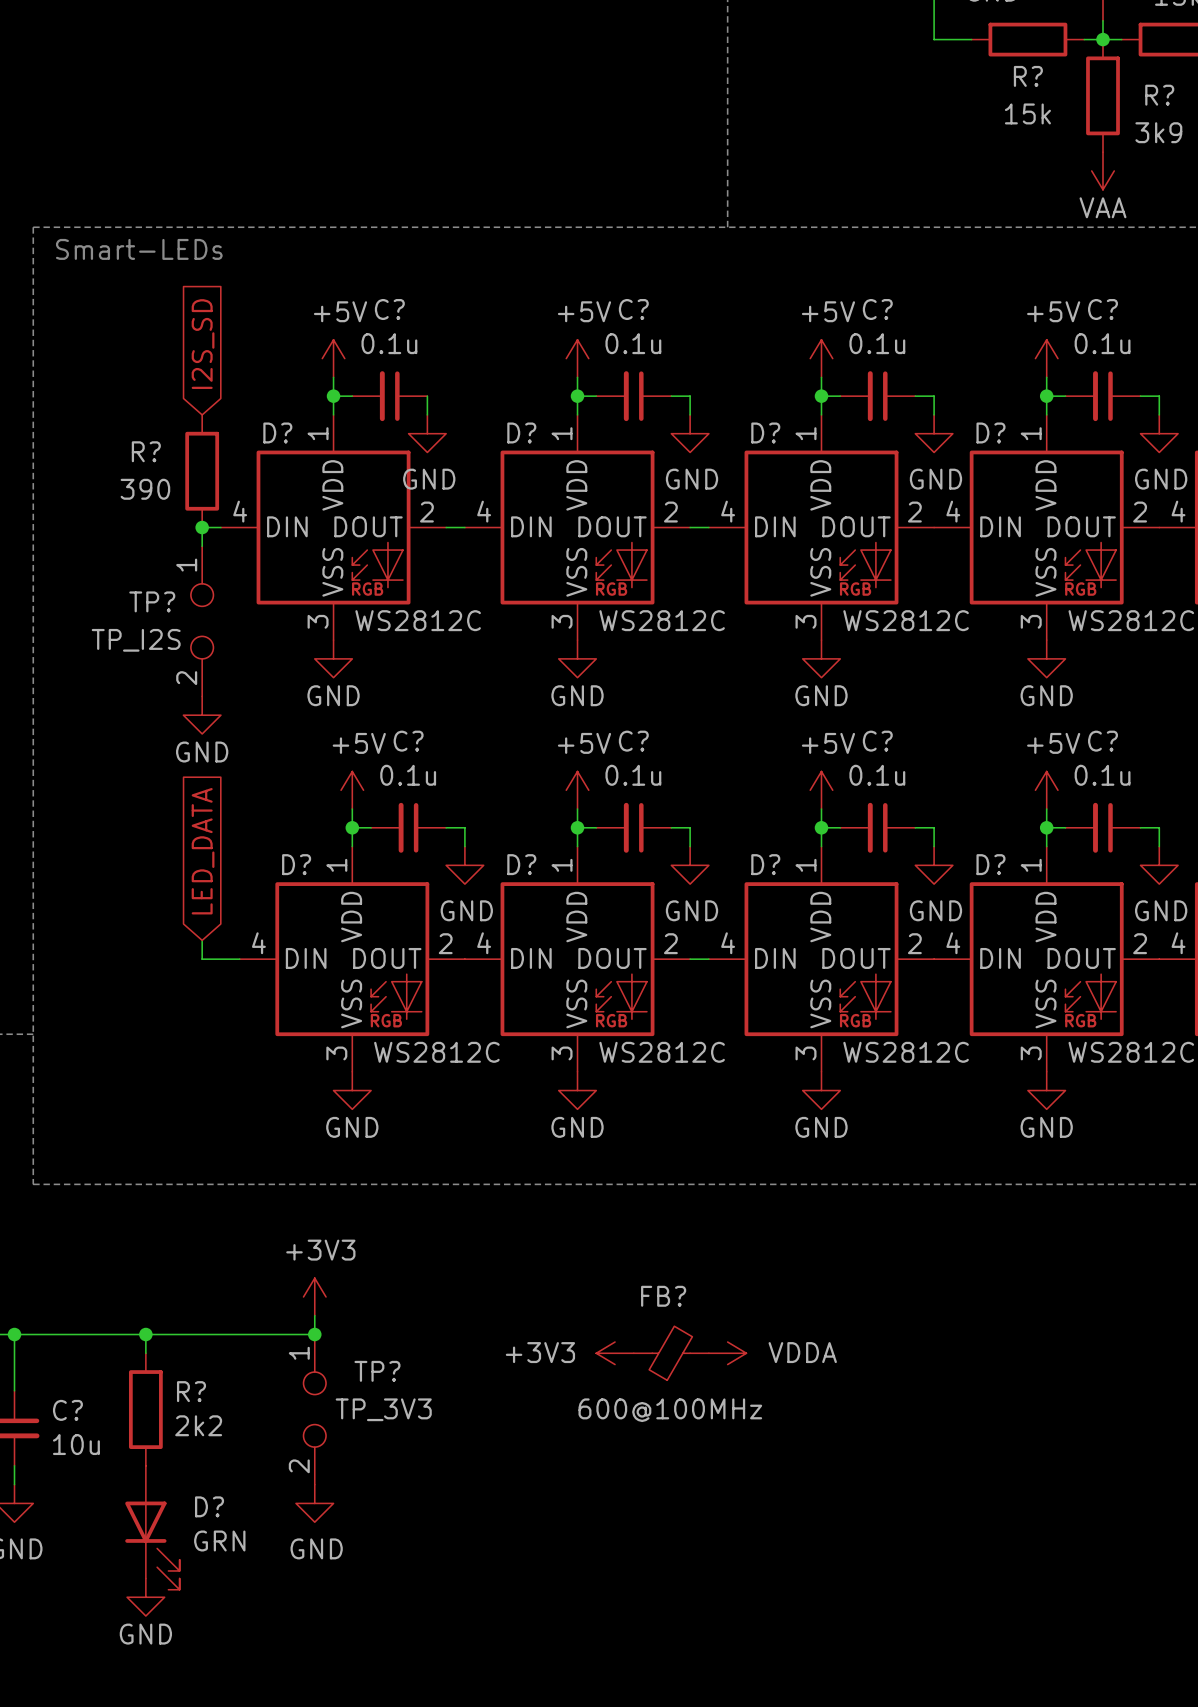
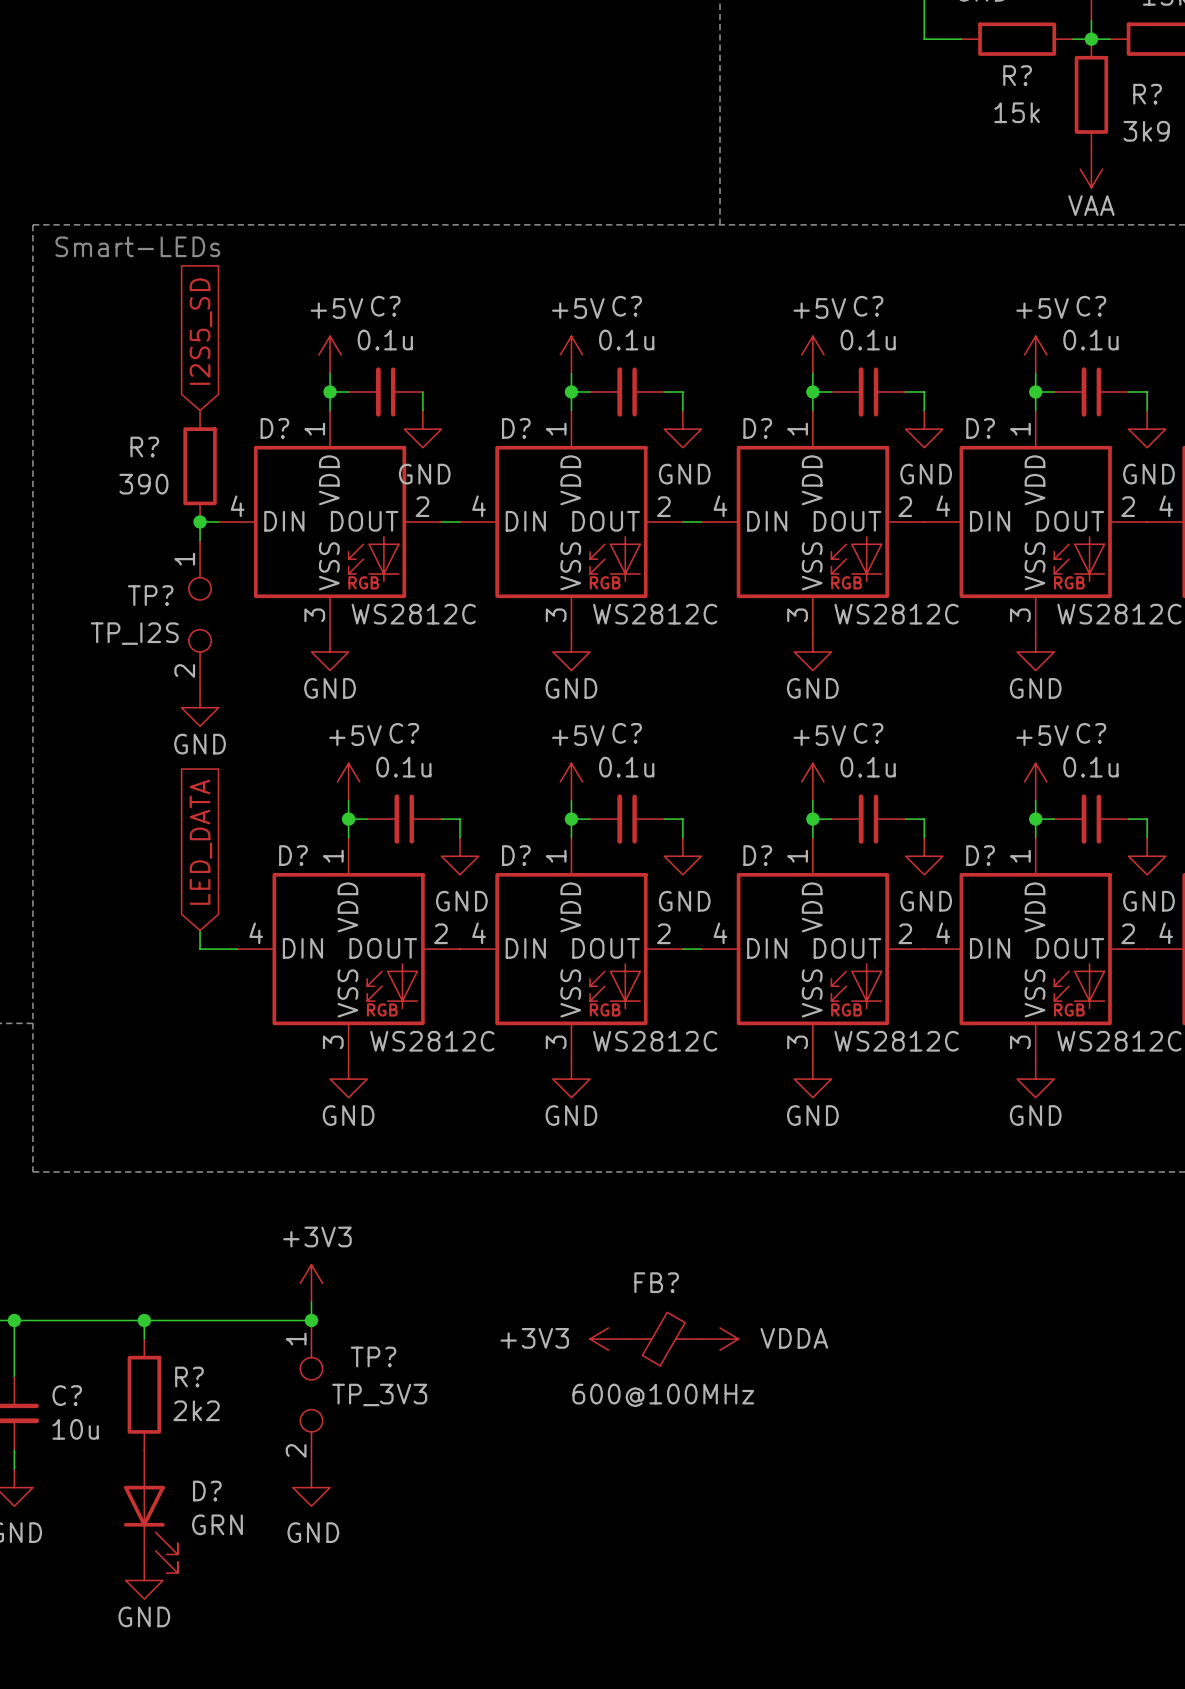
global label: I2S_SD (203, 344) -> I2S5_SD (200, 331)

